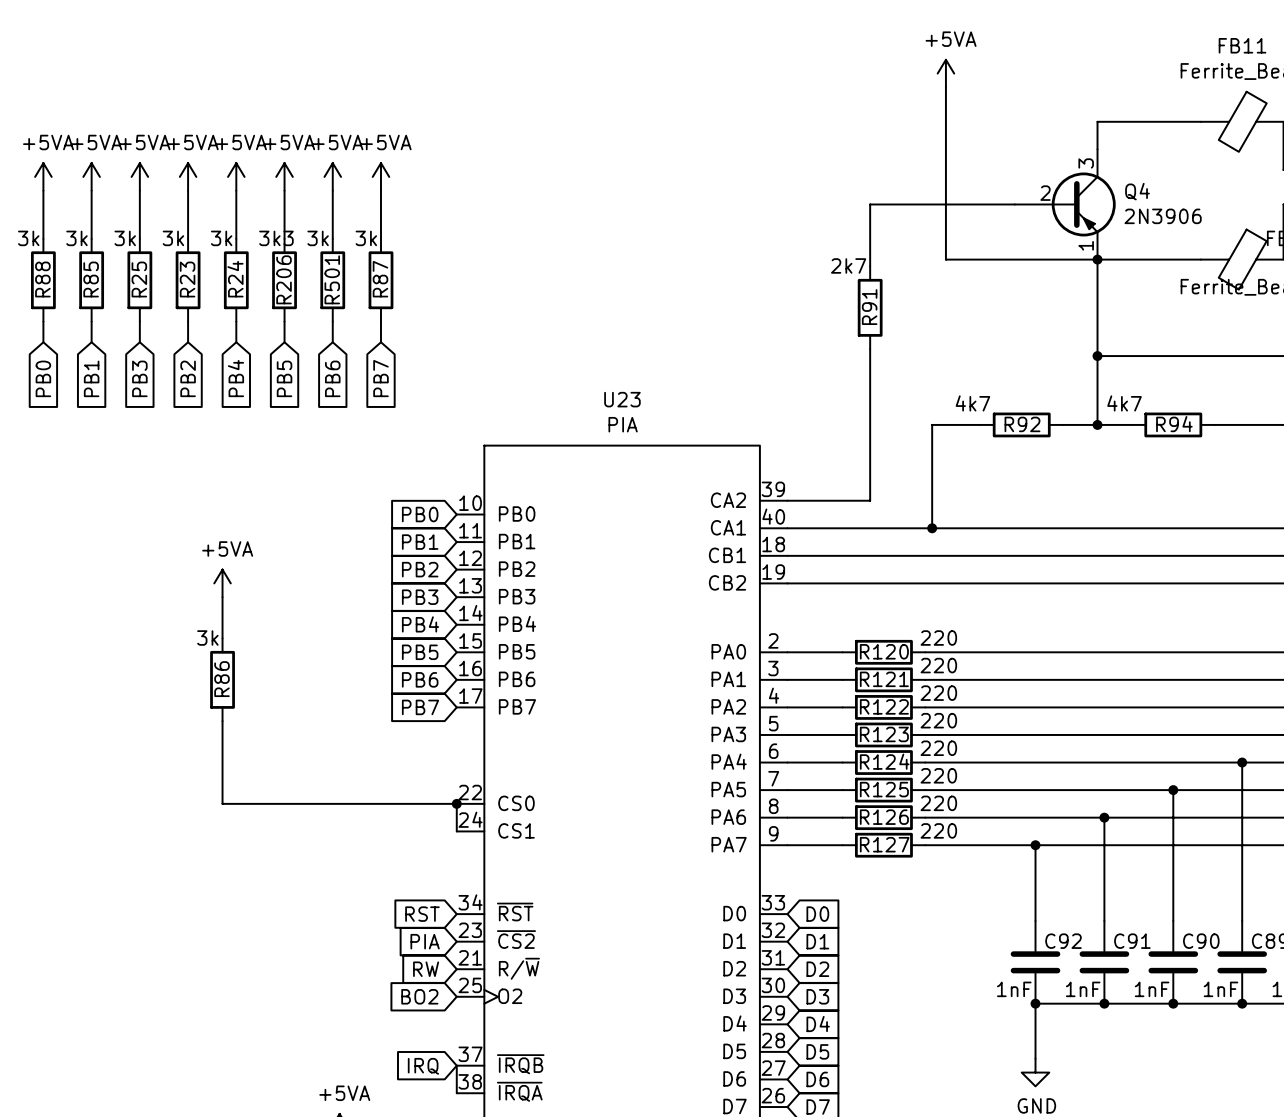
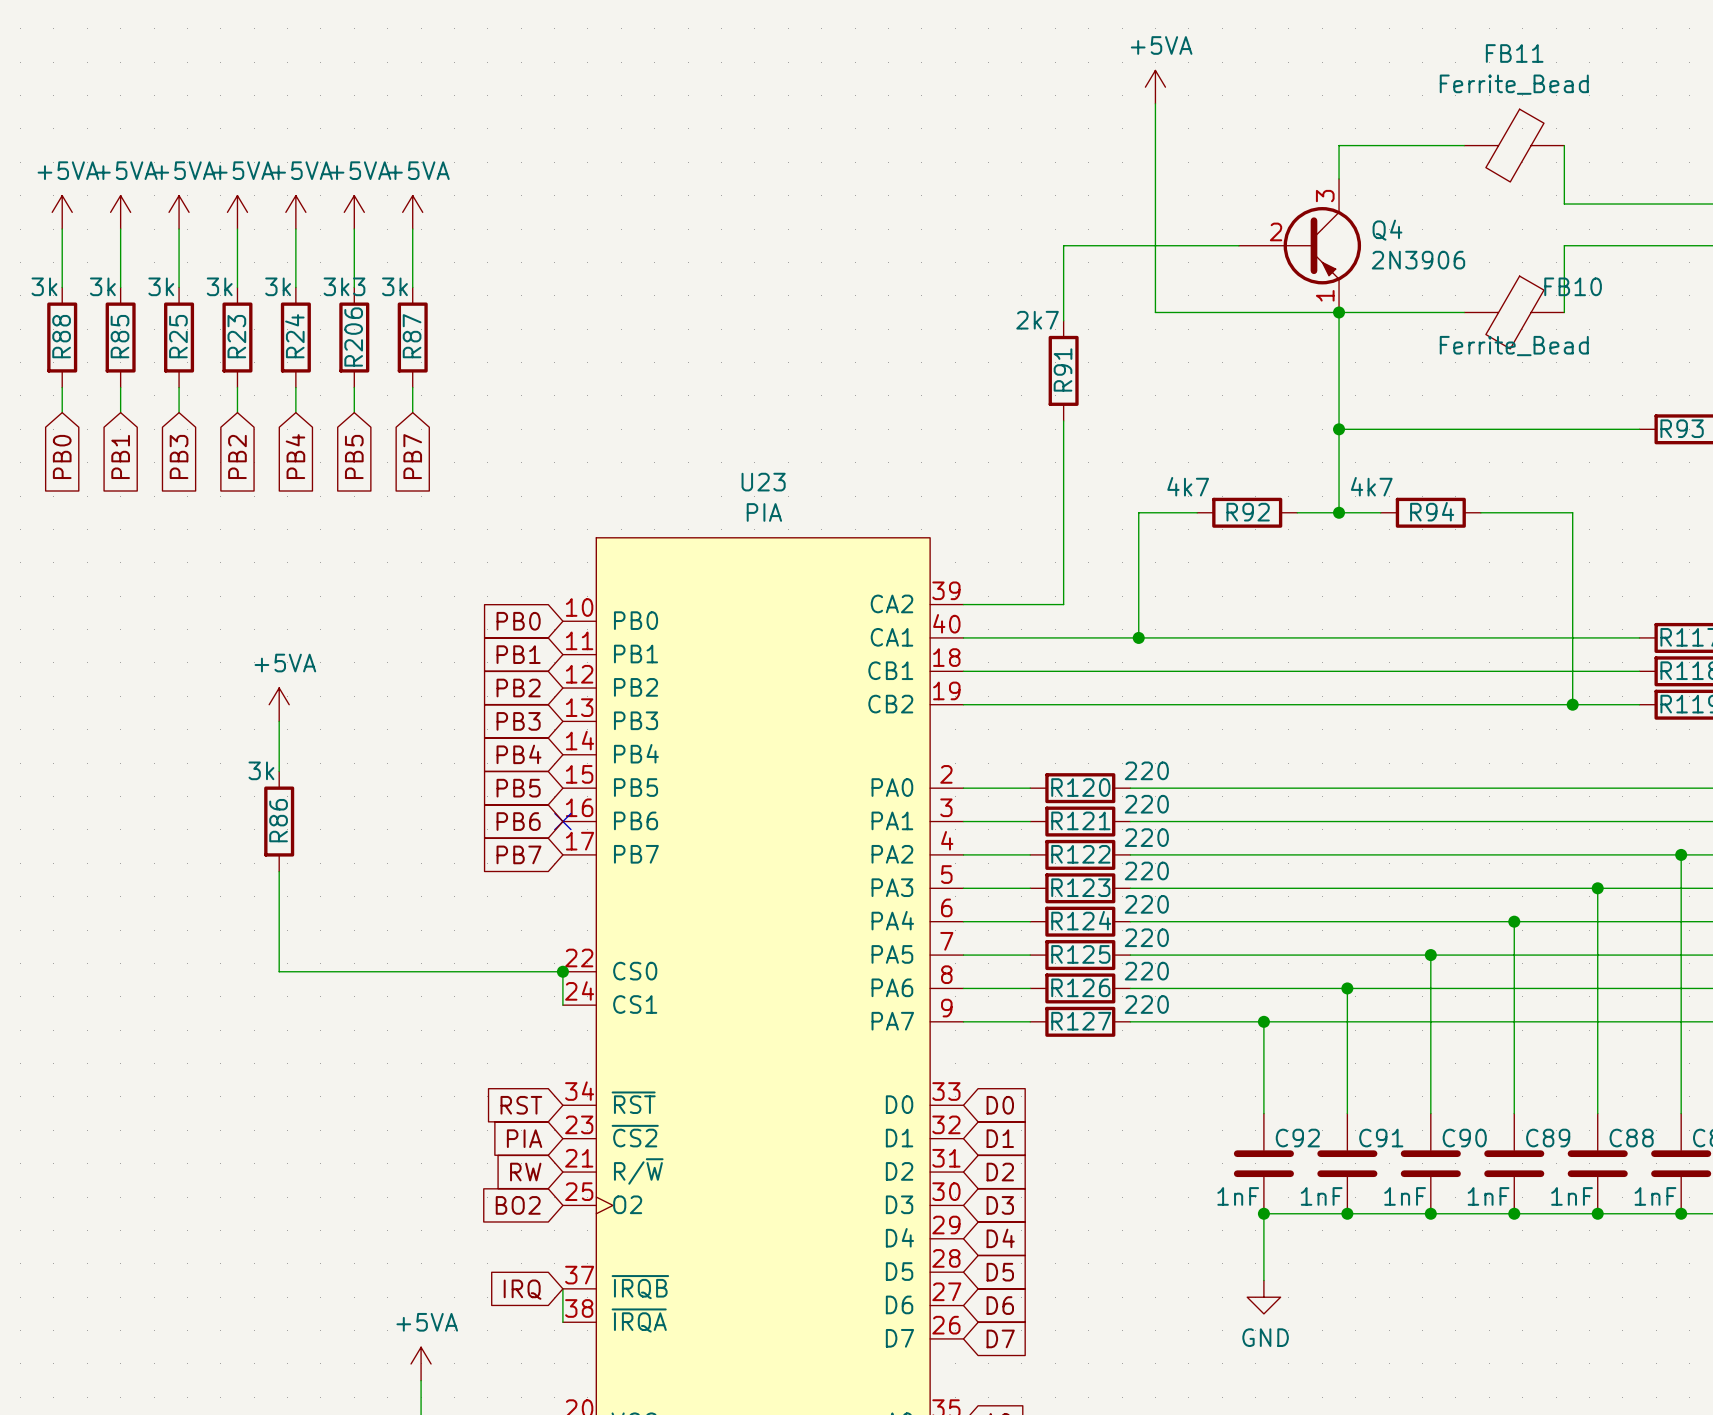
power symbol: +5VA (380, 176) -> none
wire: (380, 190) (380, 238) -> none
R501 name: R501 (332, 279) -> R87 (412, 336)
R87: 3k (380, 280) -> none
wire: (380, 321) (380, 342) -> none
global label: PB6 (332, 378) -> PB7 (412, 456)
global label: PB7 (380, 378) -> none
no-connect mark: none -> (562, 821)

